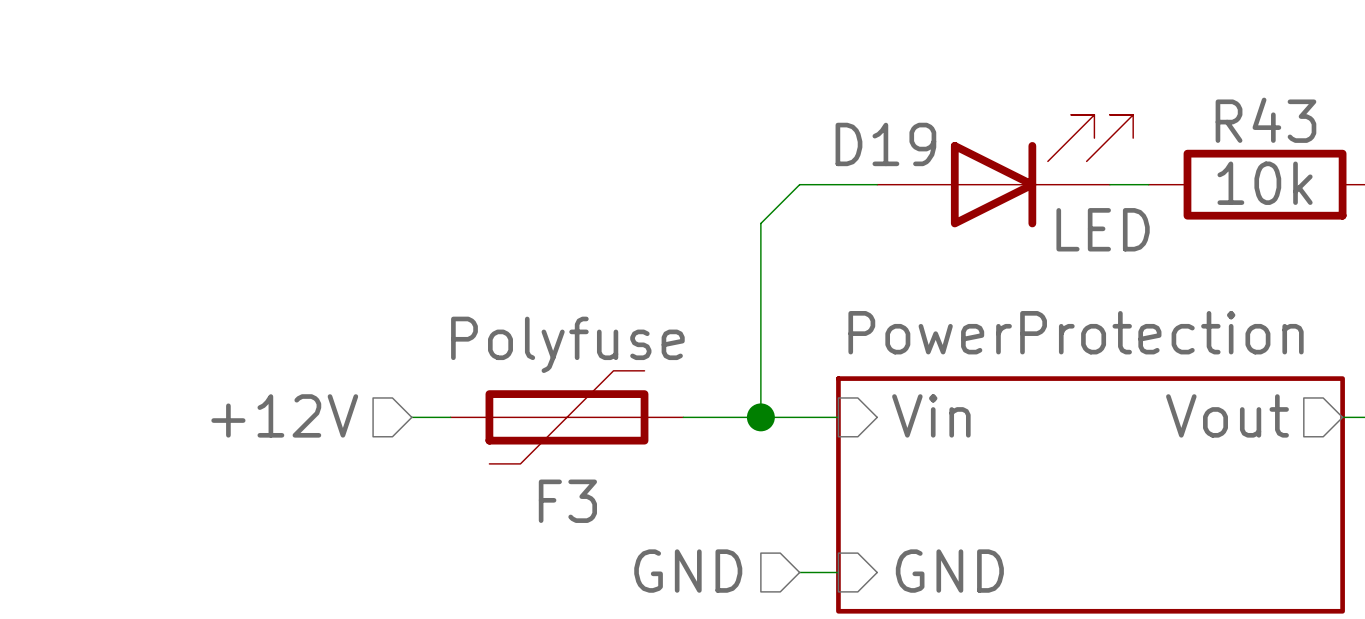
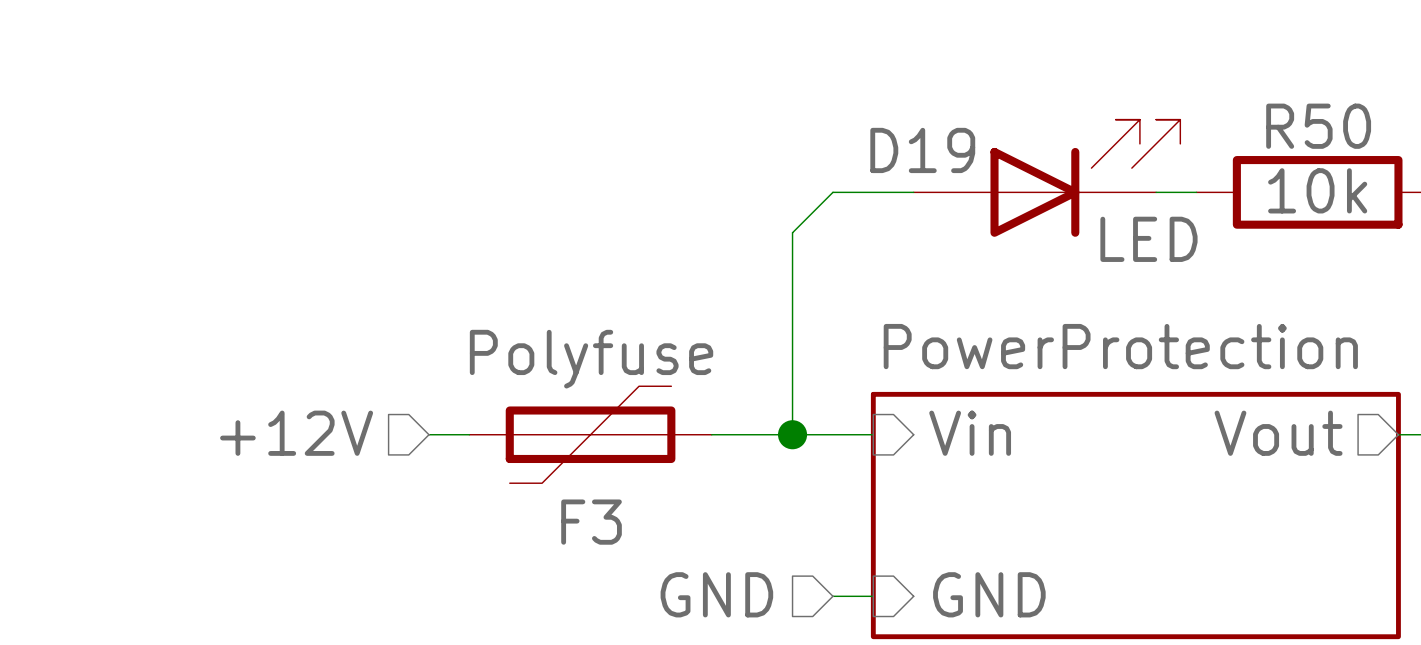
R43 name: R43 (1265, 120) -> R50 (1318, 126)

